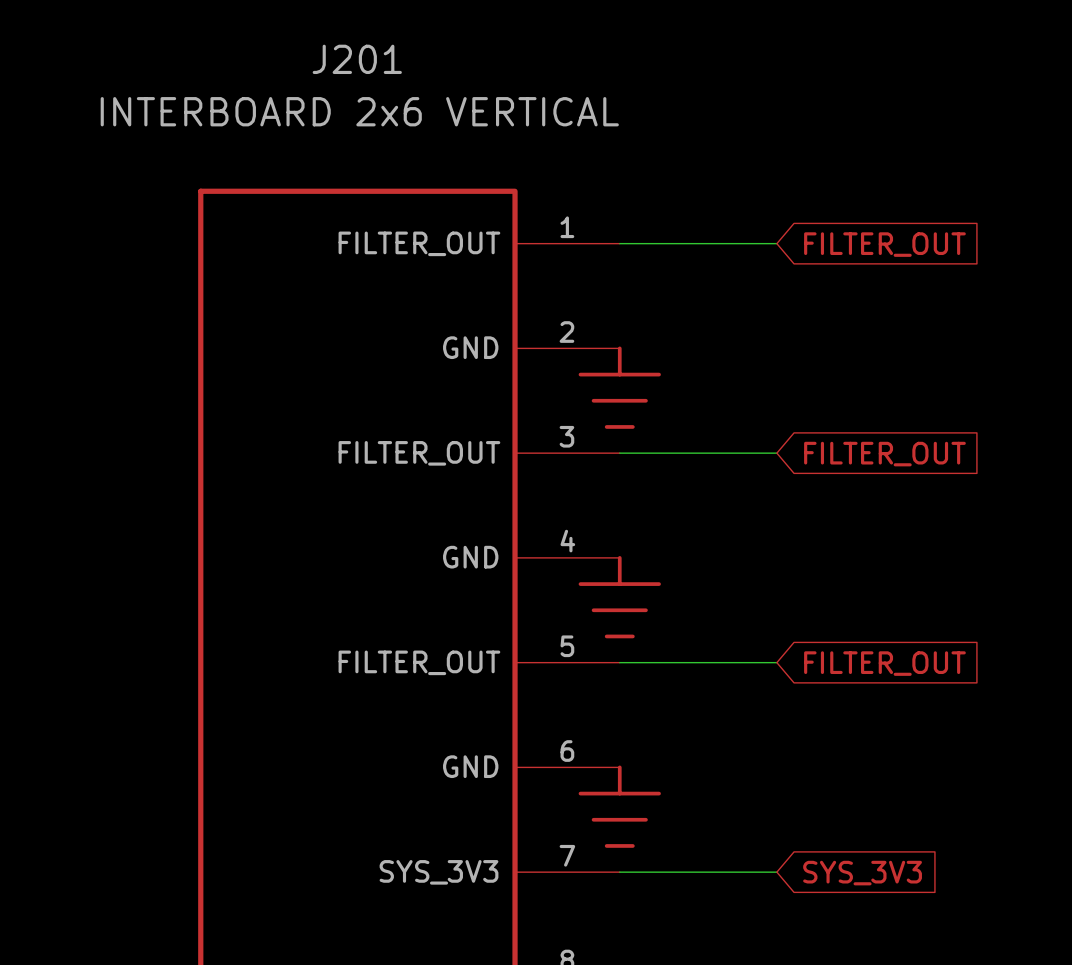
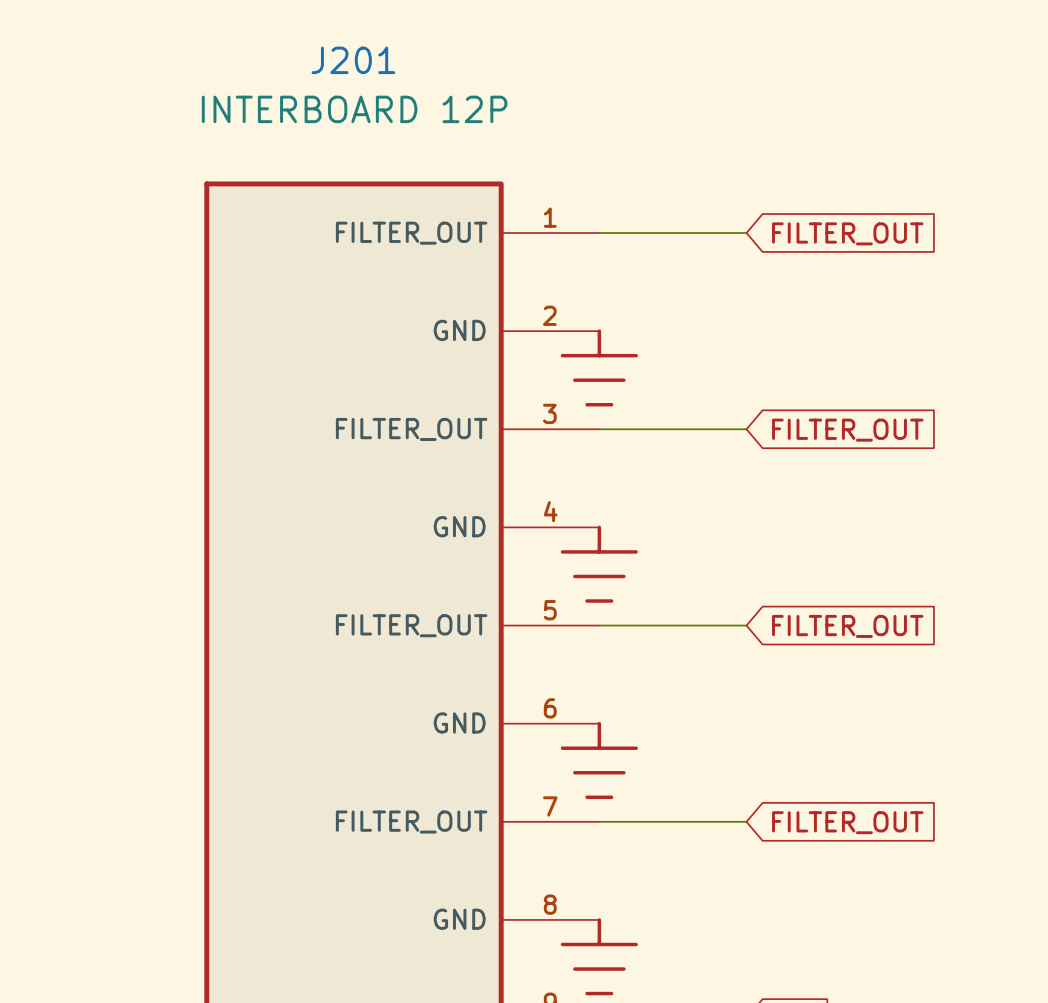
J201 value: INTERBOARD 2x6 VERTICAL (359, 111) -> INTERBOARD 12P (354, 109)
J201 pin name: SYS_3V3 (439, 872) -> FILTER_OUT (411, 822)
global label: SYS_3V3 (862, 873) -> FILTER_OUT (847, 822)

